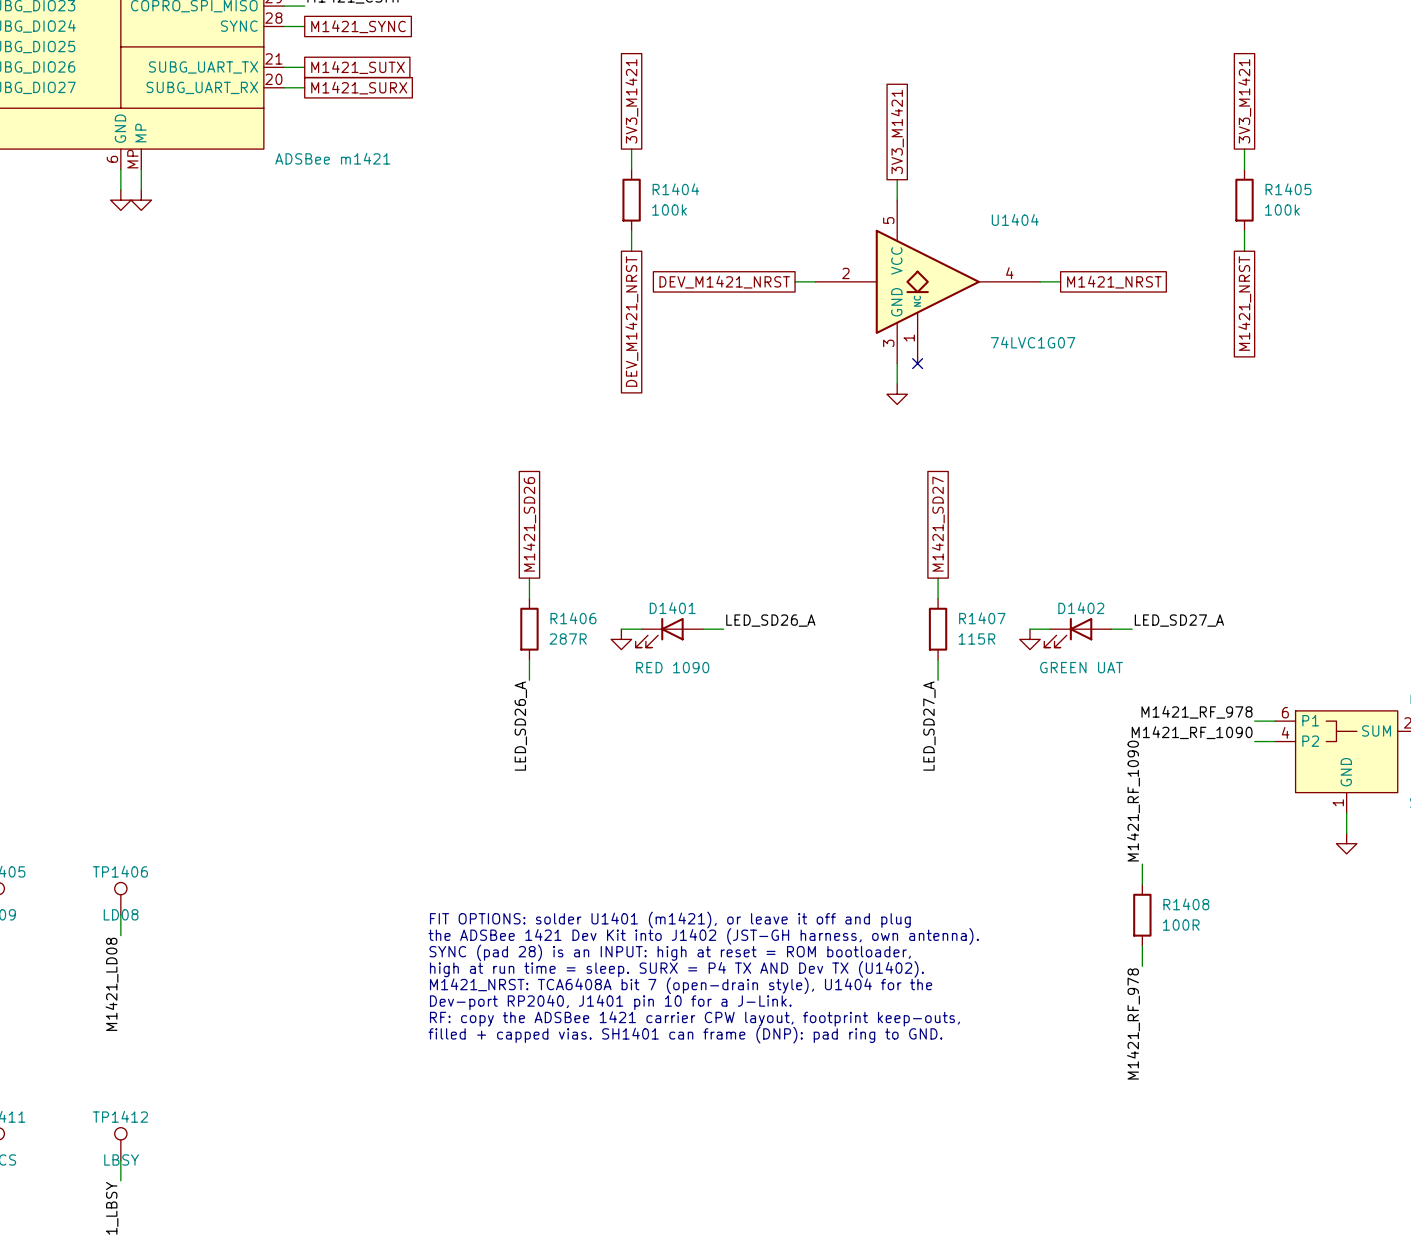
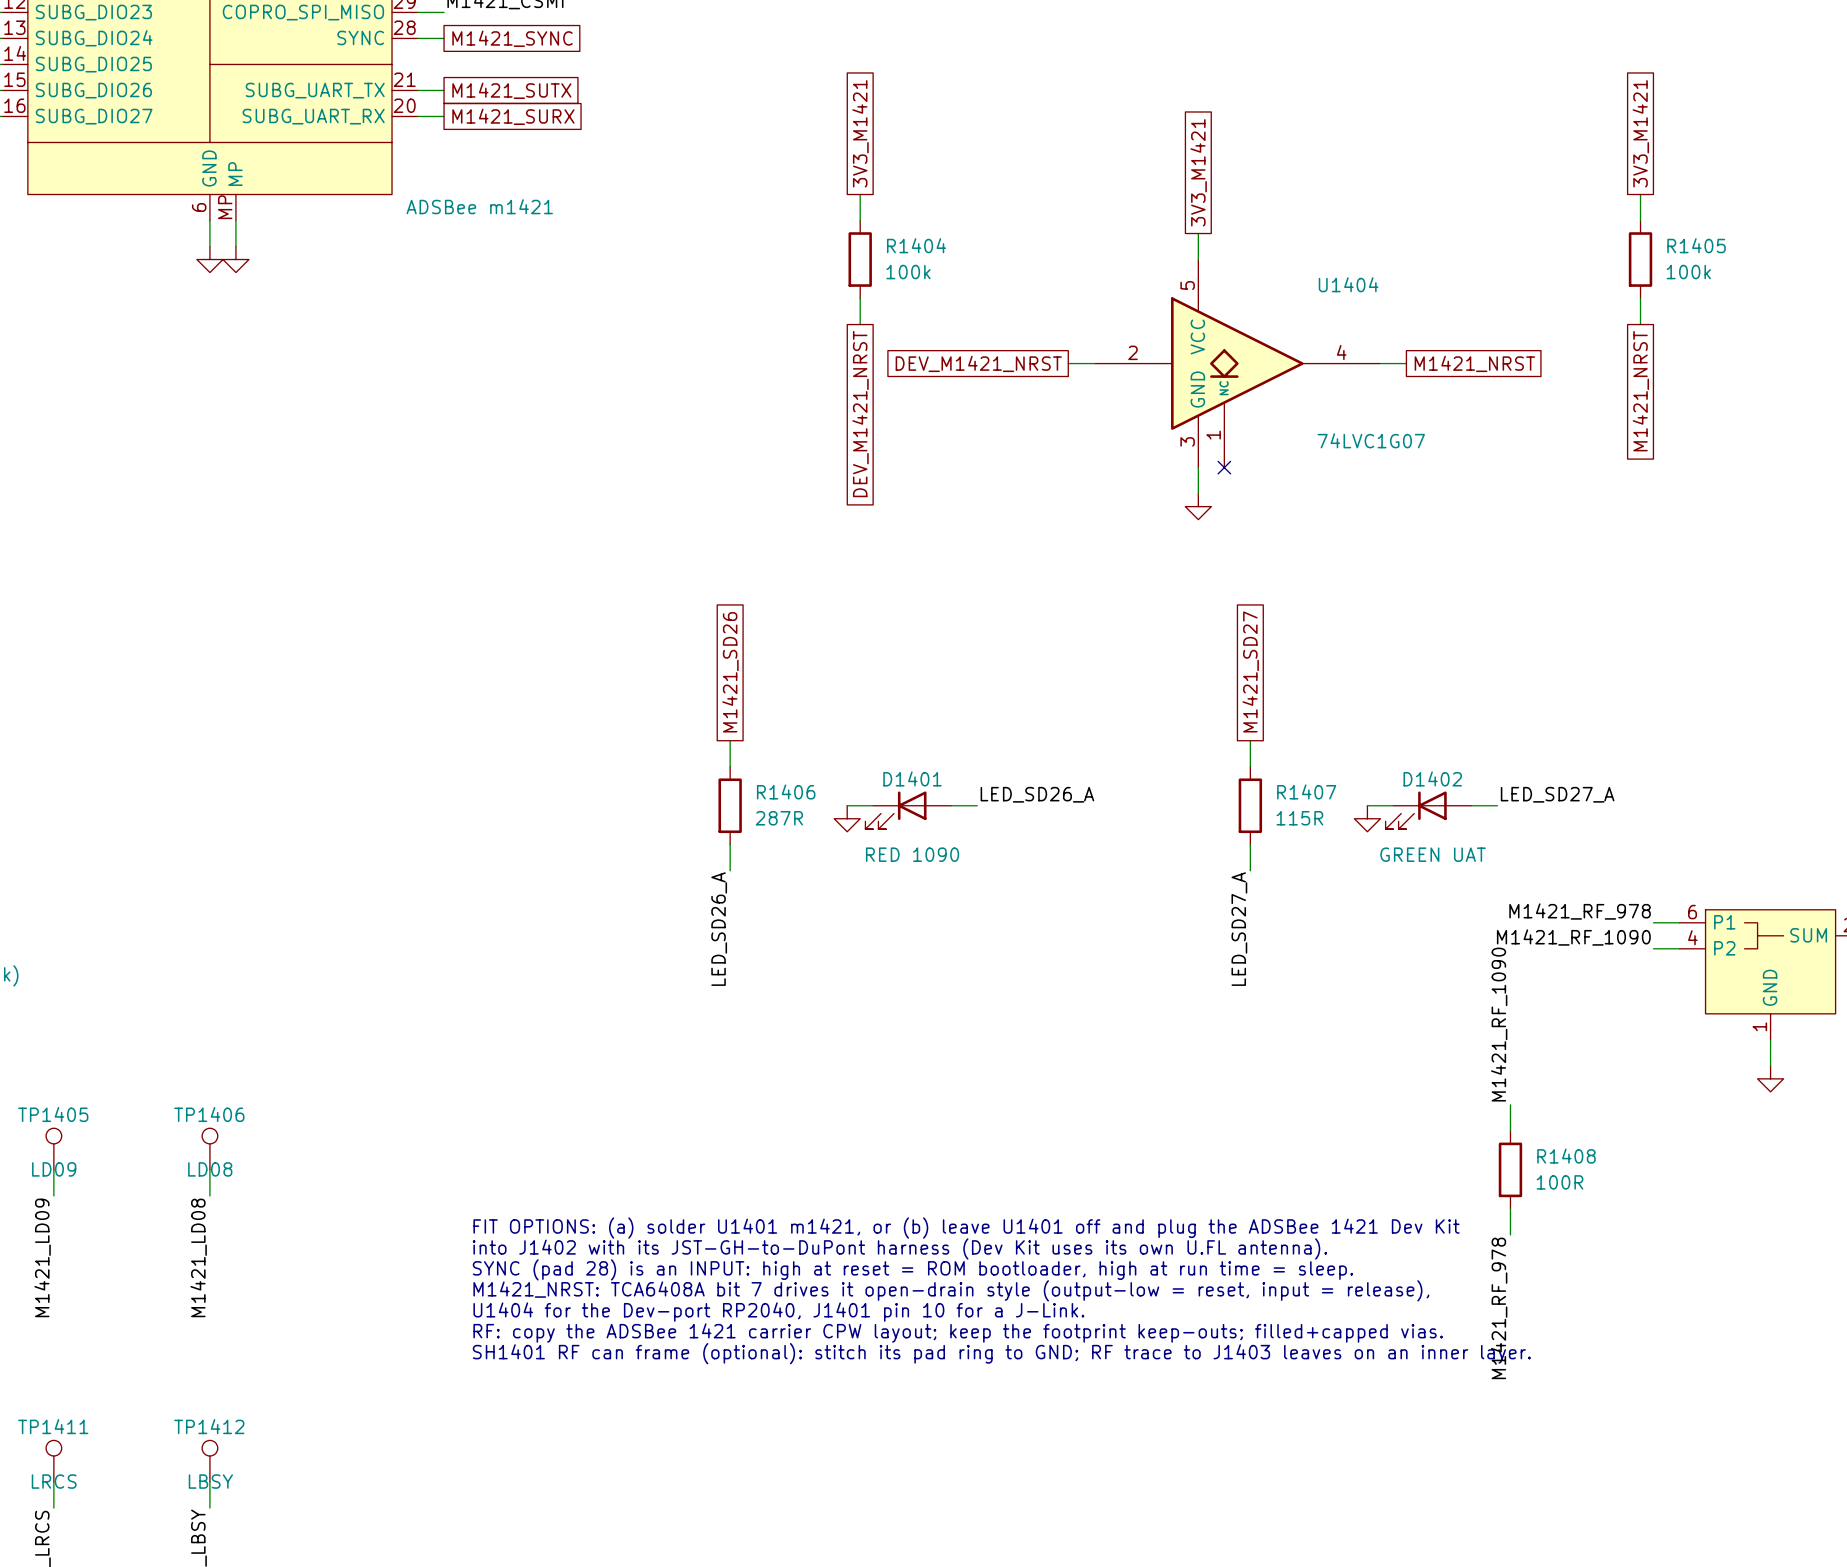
text: FIT OPTIONS: solder U1401 (m1421), or leave it off and plug (670, 920) -> none
text: the ADSBee 1421 Dev Kit into J1402 (JST-GH harness, own antenna). (703, 936) -> none
text: SYNC (pad 28) is an INPUT: high at reset = ROM bootloader, (670, 952) -> none
text: none -> FIT OPTIONS: (a) solder U1401 m1421, or (b) leave U1401 off and plug the ADSBee 1421 Dev Kit (966, 1228)
text: high at run time = sleep. SURX = P4 TX AND Dev TX (U1402). (676, 969) -> none
text: none -> into J1402 with its JST-GH-to-DuPont harness (Dev Kit uses its own U.FL antenna). (899, 1248)
text: M1421_NRST: TCA6408A bit 7 (open-drain style), U1404 for the (681, 985) -> none
text: none -> SYNC (pad 28) is an INPUT: high at reset = ROM bootloader, high at run time = sleep. (912, 1269)
text: Dev-port RP2040, J1401 pin 10 for a J-Link. (610, 1002) -> none
text: none -> M1421_NRST: TCA6408A bit 7 drives it open-drain style (output-low = reset, input = release), (951, 1290)
text: RF: copy the ADSBee 1421 carrier CPW layout, footprint keep-outs, (694, 1018) -> none
text: none -> U1404 for the Dev-port RP2040, J1401 pin 10 for a J-Link. (778, 1312)
text: filled + capped vias. SH1401 can frame (DNP): pad ring to GND. (685, 1035) -> none
text: none -> RF: copy the ADSBee 1421 carrier CPW layout; keep the footprint keep-outs; filled+capped vias. (958, 1333)
text: none -> SH1401 RF can frame (optional): stitch its pad ring to GND; RF trace to J1403 leaves on an inner layer. (1001, 1353)

